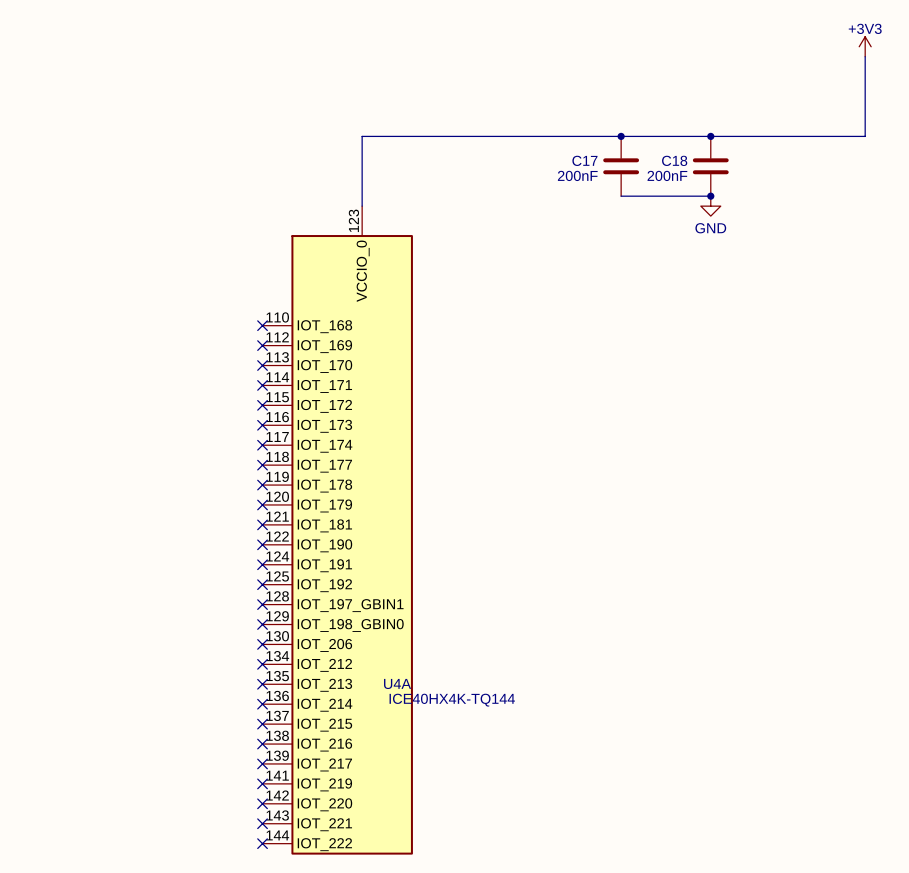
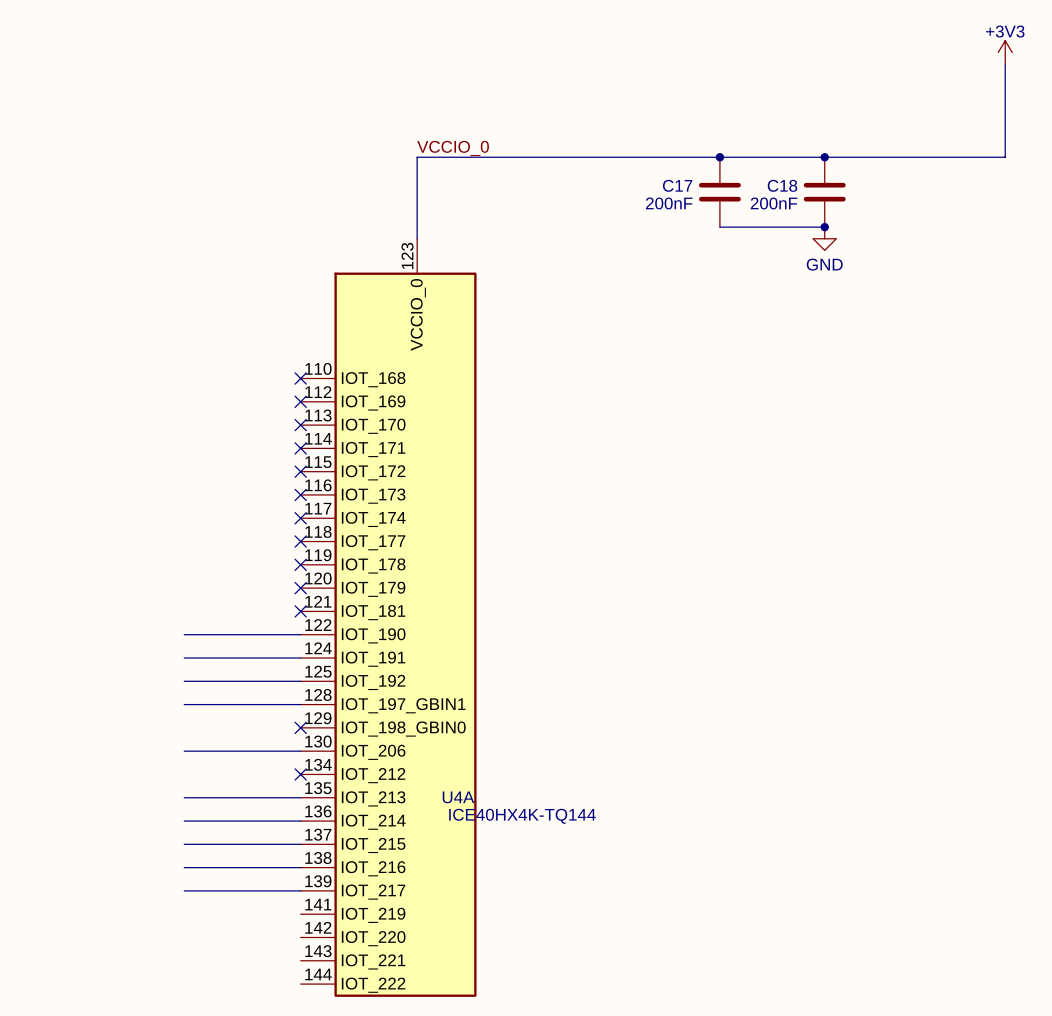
label: none -> VCCIO_0 (453, 148)
wire: none -> (184, 634) (300, 634)
no-connect mark: (262, 544) -> none
wire: none -> (184, 658) (300, 658)
no-connect mark: (262, 564) -> none
wire: none -> (184, 681) (300, 681)
no-connect mark: (262, 584) -> none
wire: none -> (184, 704) (300, 704)
no-connect mark: (262, 604) -> none
wire: none -> (184, 751) (300, 751)
no-connect mark: (262, 644) -> none
wire: none -> (184, 797) (300, 797)
no-connect mark: (262, 684) -> none
wire: none -> (184, 821) (300, 821)
no-connect mark: (262, 704) -> none
wire: none -> (184, 844) (300, 844)
no-connect mark: (262, 724) -> none
wire: none -> (184, 867) (300, 867)
no-connect mark: (262, 744) -> none
wire: none -> (184, 890) (300, 890)
no-connect mark: (262, 763) -> none
no-connect mark: (262, 783) -> none
no-connect mark: (262, 803) -> none
no-connect mark: (262, 823) -> none
no-connect mark: (262, 843) -> none

